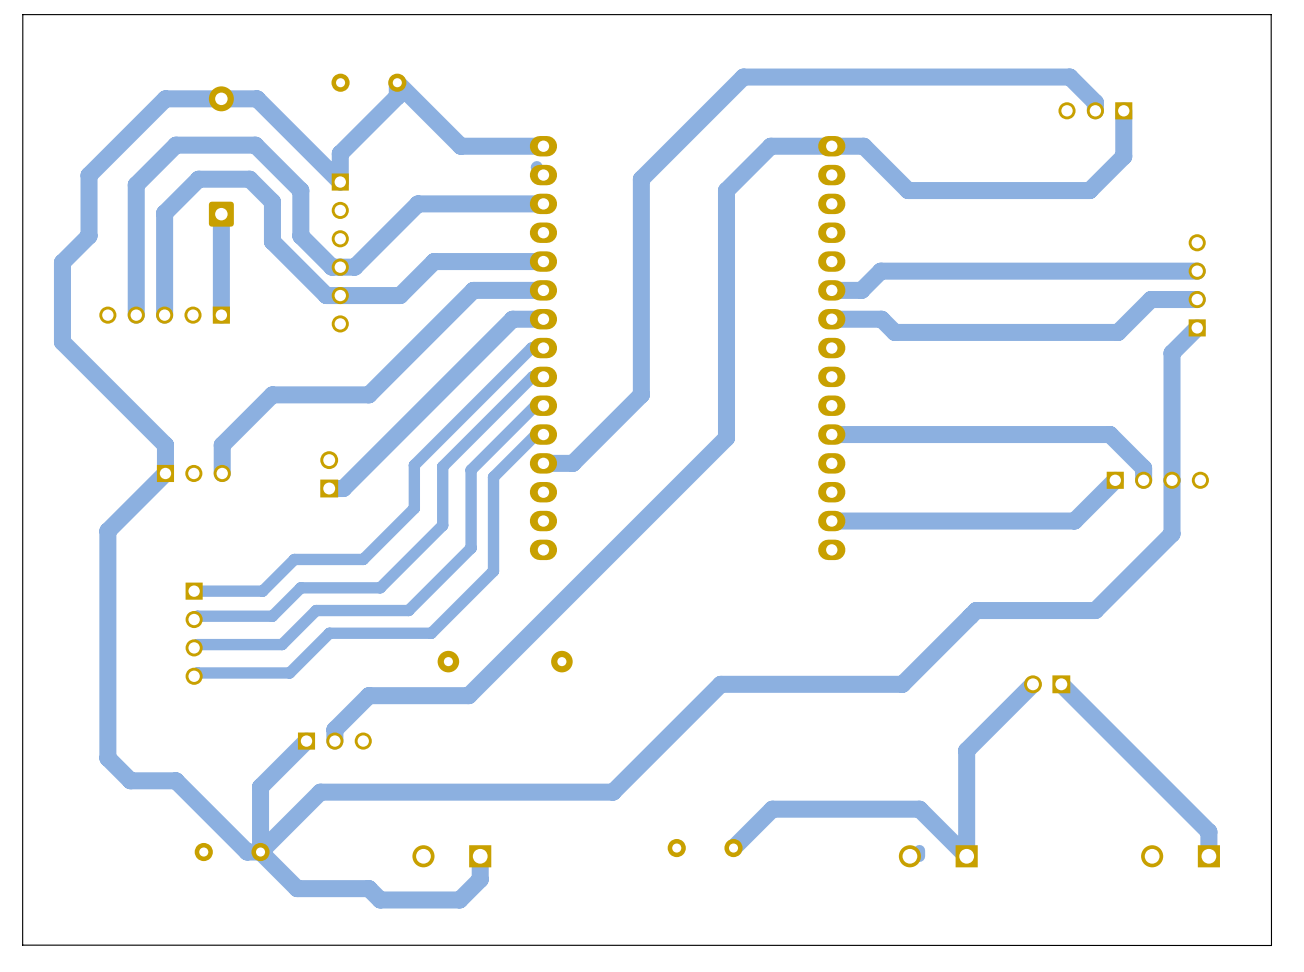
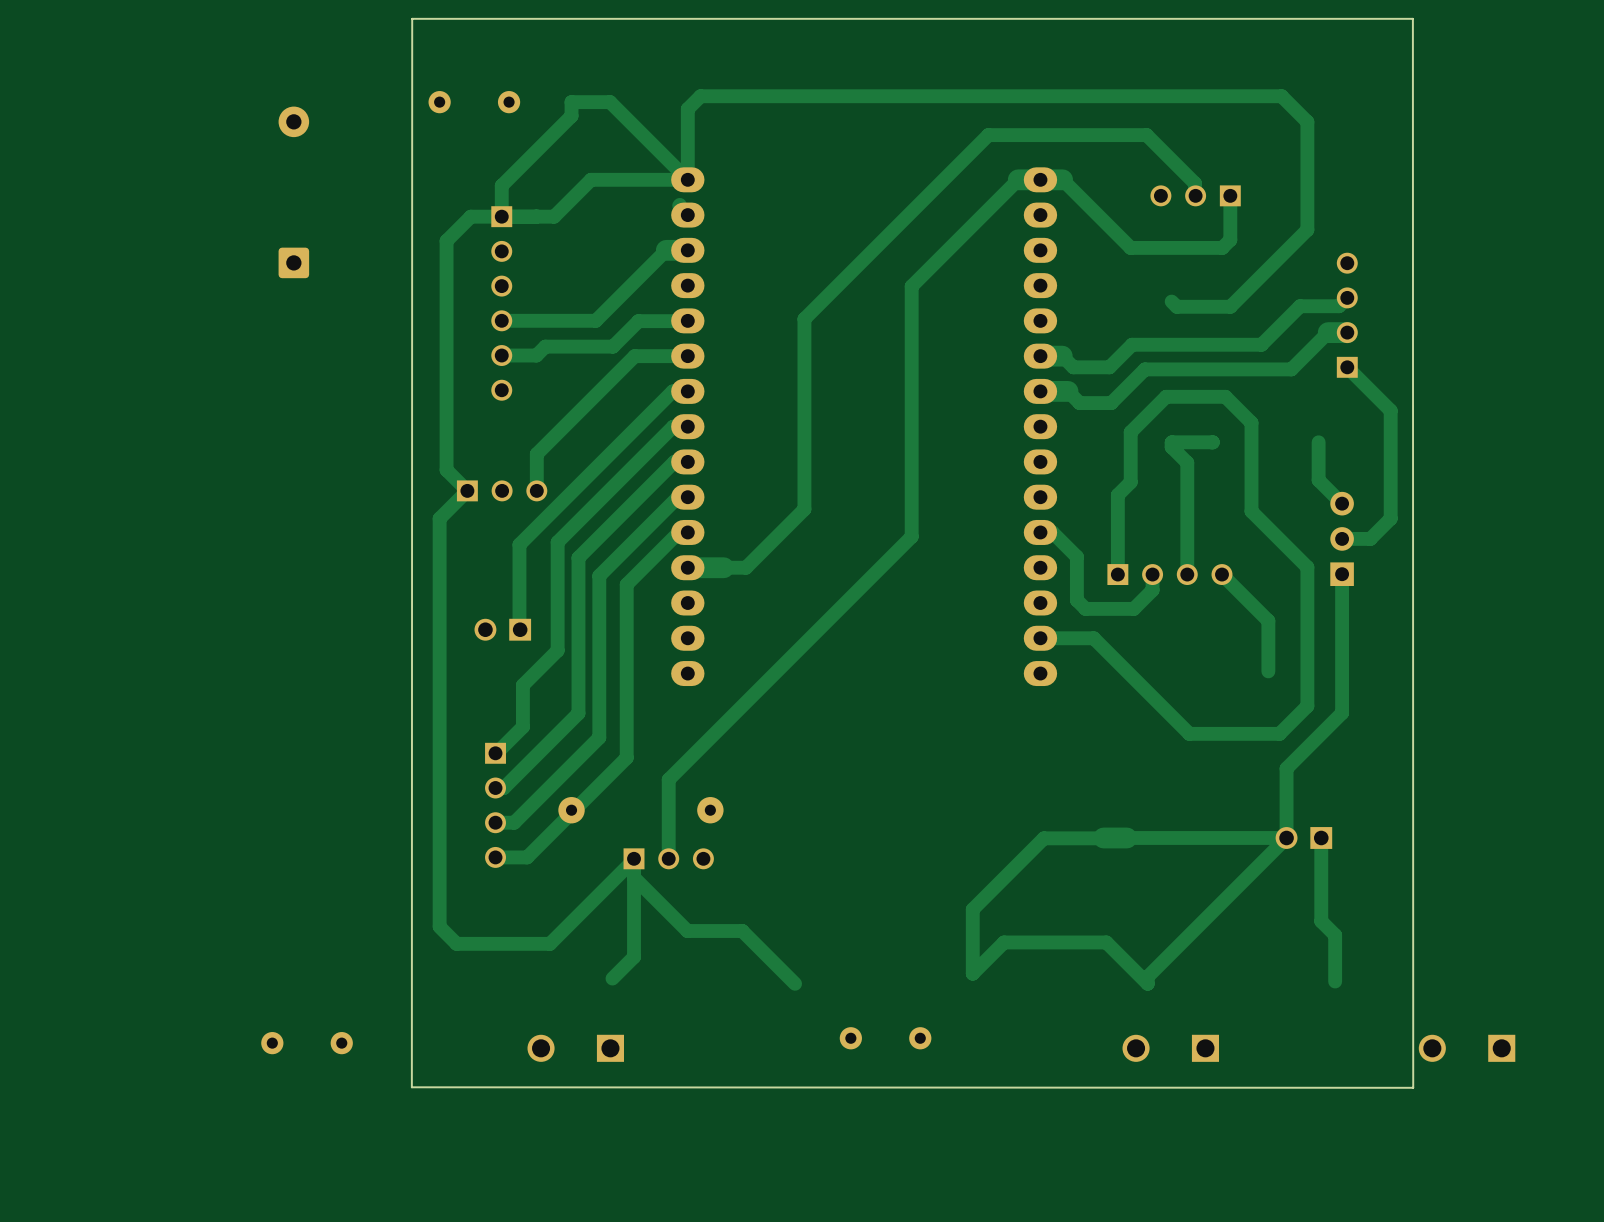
board edge: (1136, 14) (1271, 14) (1271, 945) (22, 945) (22, 14) (318, 14) -> (1412, 18) (1413, 1087) (411, 1087) (412, 18)
track: (1095, 110) (1095, 102) (1069, 77) (743, 77) (641, 179) (641, 394) (572, 463) -> (1194, 196) (1194, 183) (1146, 135) (988, 135) (804, 319) (804, 509) (745, 567) (723, 567)
part position: (1095, 110) -> (1195, 195)
track: (1123, 110) (1123, 156) (1089, 190) (908, 190) (863, 146) (849, 146) -> (1230, 195) (1230, 239) (1222, 247) (1130, 247) (1062, 179)
track: (464, 146) (460, 146) (397, 82) (397, 96) (340, 153) (340, 182) (257, 98) (165, 98) (89, 175) (89, 235) (62, 262) (62, 342) (165, 445) (165, 473) (107, 531) (107, 758) (130, 780) (175, 780) (247, 852) (260, 852) -> (591, 179) (554, 216) (470, 216) (446, 240) (446, 470) (467, 490) (439, 518) (439, 926)
track width: thick (543, 146) (464, 146) -> thin (687, 179) (591, 179)
track: (813, 146) (770, 146) (726, 190) (726, 233) -> (1018, 179) (911, 286)
track: none -> (501, 216) (501, 185) (571, 116) (571, 102) (610, 102) (687, 179) (687, 109) (700, 96) (1281, 96) (1307, 121) (1307, 229) (1230, 306) (1176, 306) (1171, 301)
track: (525, 203) (418, 203) (354, 267) (332, 267) (300, 235) (300, 190) (255, 145) (175, 145) (136, 184) (136, 315) -> (666, 250) (595, 320) (501, 320)
track: (221, 214) (221, 315) -> none
track width: thick (726, 233) (726, 438) (527, 636) -> thin (911, 286) (911, 536) (668, 779)
track: none -> (1347, 297) (1338, 306) (1300, 306) (1261, 344) (1132, 344) (1109, 367) (1073, 367) (1062, 356)
part position: (340, 252) -> (501, 303)
part: none -> (1347, 315)
track: (543, 261) (434, 261) (400, 295) (326, 295) (272, 241) (272, 201) (249, 179) (198, 179) (164, 213) (164, 315) -> (687, 320) (638, 321) (613, 346) (545, 346) (536, 355) (501, 355)
track: (1067, 271) (880, 271) (861, 290) (849, 290) -> (1328, 332) (1291, 369) (1144, 369) (1111, 403) (1079, 403) (1068, 391)
track: (1197, 271) (1082, 271) -> none
part: (1197, 285) -> none
track: (500, 290) (473, 290) (368, 394) (272, 394) (222, 445) (222, 473) -> (634, 356) (536, 454) (536, 490)
track width: thick (543, 290) (500, 290) -> thin (687, 356) (634, 356)
track: none -> (1347, 367) (1390, 410) (1390, 518) (1370, 538) (1342, 538)
track: (1197, 299) (1151, 299) (1118, 332) (894, 332) (881, 319) (854, 319) -> none
part: (164, 315) -> none
track: (531, 319) (512, 319) (343, 488) (329, 488) -> (672, 391) (519, 544) (520, 629)
track: (1197, 327) (1172, 353) (1172, 533) (1095, 610) (976, 610) (902, 684) -> (1342, 574) (1342, 713) (1286, 768) (1286, 837) (1126, 837)
track: none -> (1318, 442) (1318, 480) (1342, 503)
track: none -> (1212, 442) (1171, 442) (1171, 447) (1187, 462) (1187, 574)
part: none -> (502, 490)
track: (841, 434) (1109, 434) (1143, 468) (1143, 480) -> (1052, 532) (1076, 556) (1076, 600) (1085, 608) (1133, 608) (1152, 590) (1152, 574)
part: none -> (1342, 538)
track: (437, 442) (414, 465) (414, 508) (363, 559) (294, 559) (262, 591) (194, 591) -> none
track: (454, 455) (442, 466) (442, 525) (437, 531) -> (557, 542) (557, 650)
track: none -> (578, 557) (578, 713) (503, 788) (495, 788)
part: none -> (1169, 574)
track: none -> (1221, 574) (1268, 620) (1268, 671)
part: (193, 473) -> none
part rotation: 0° (329, 474) -> 90° counterclockwise (502, 629)
part position: (329, 474) -> (502, 629)
track: (1115, 480) (1074, 521) (875, 521) -> (1117, 574) (1117, 495) (1130, 482) (1130, 432) (1166, 396) (1225, 396) (1251, 422) (1251, 511) (1307, 567) (1307, 706) (1279, 733) (1189, 733) (1093, 638)
part: (1157, 480) -> none
track width: thick (875, 521) (831, 521) -> thin (1093, 638) (1040, 638)
track: (471, 548) (408, 610) (316, 610) (282, 644) (197, 644) (194, 647) -> (599, 671) (599, 737) (514, 822) (495, 822)
track: (408, 559) (380, 587) (300, 587) (272, 616) (197, 616) (194, 619) -> (522, 685) (522, 726) (495, 753)
track: (493, 571) (431, 633) (329, 633) (289, 672) (197, 672) (194, 676) -> (626, 699) (626, 757) (527, 857) (495, 857)
part position: (194, 633) -> (495, 805)
track: (527, 636) (468, 695) (368, 695) (334, 729) (334, 741) -> (668, 779) (668, 858)
track: (883, 684) (720, 684) (612, 792) (320, 792) (260, 852) -> none
track width: thick (1032, 684) (966, 750) -> thin (1286, 837) (1205, 919)
track: (1061, 684) (1208, 831) (1208, 856) -> (1321, 837) (1321, 921) (1335, 935) (1335, 981)
track: none -> (634, 858) (634, 957) (612, 978)
part: none -> (668, 858)
track: none -> (634, 859) (550, 943) (456, 943) (439, 926)
track: none -> (634, 877) (687, 931) (742, 931) (795, 983)
track: (306, 741) (260, 787) (260, 852) -> none
part: (334, 741) -> none
track: (966, 750) (966, 856) (919, 809) (772, 809) (733, 848) -> (1205, 919) (1147, 976) (1147, 983) (1106, 942) (1004, 942) (972, 973) (972, 909) (1043, 838) (1103, 837)
track: (919, 850) (919, 856) -> none
track: (260, 852) (297, 888) (368, 888) (380, 899) (459, 899) (480, 879) (480, 856) -> none

